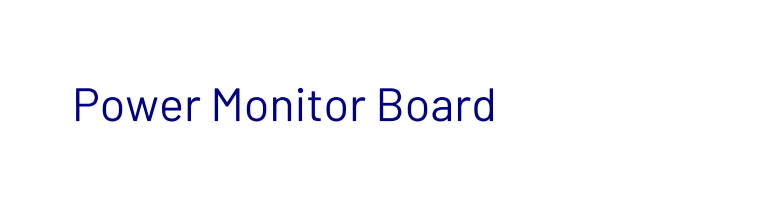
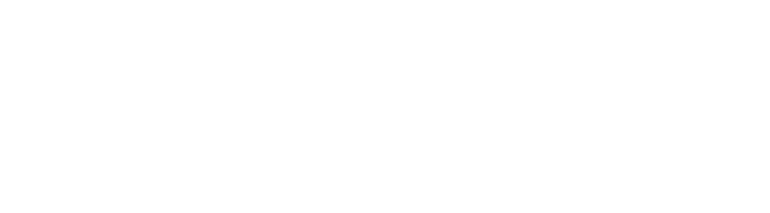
text: Power Monitor Board (284, 104) -> none

